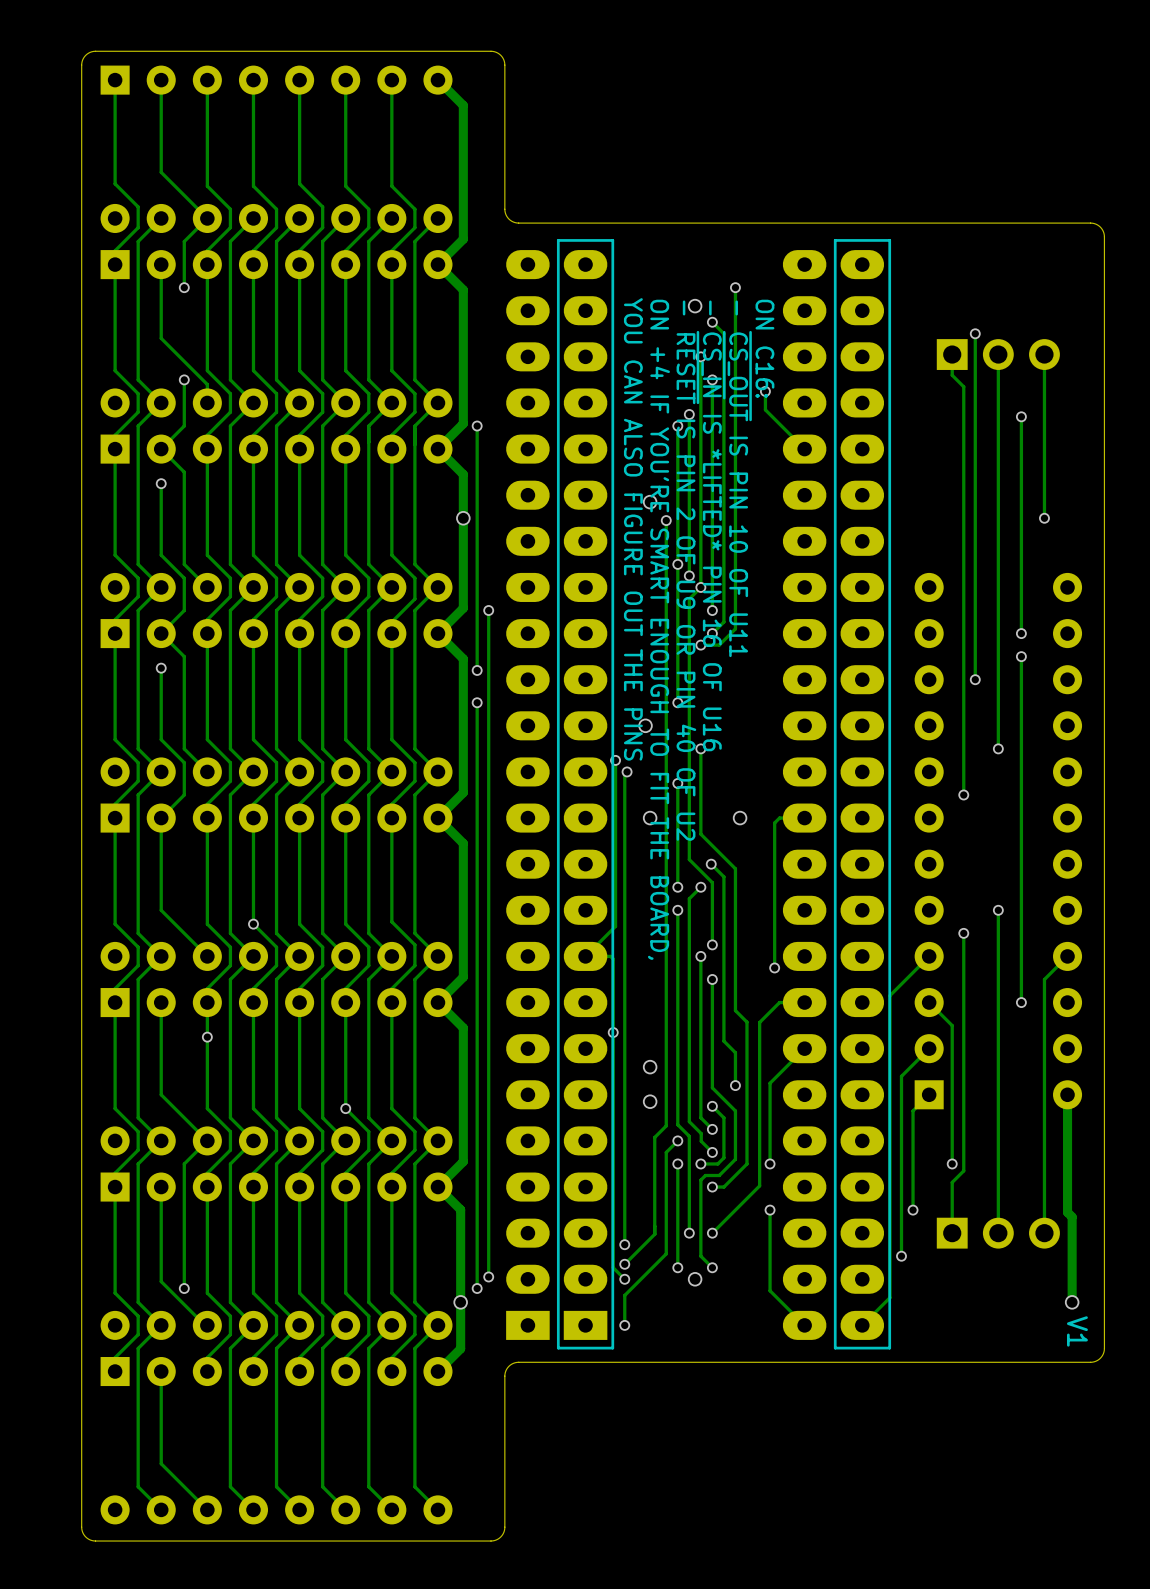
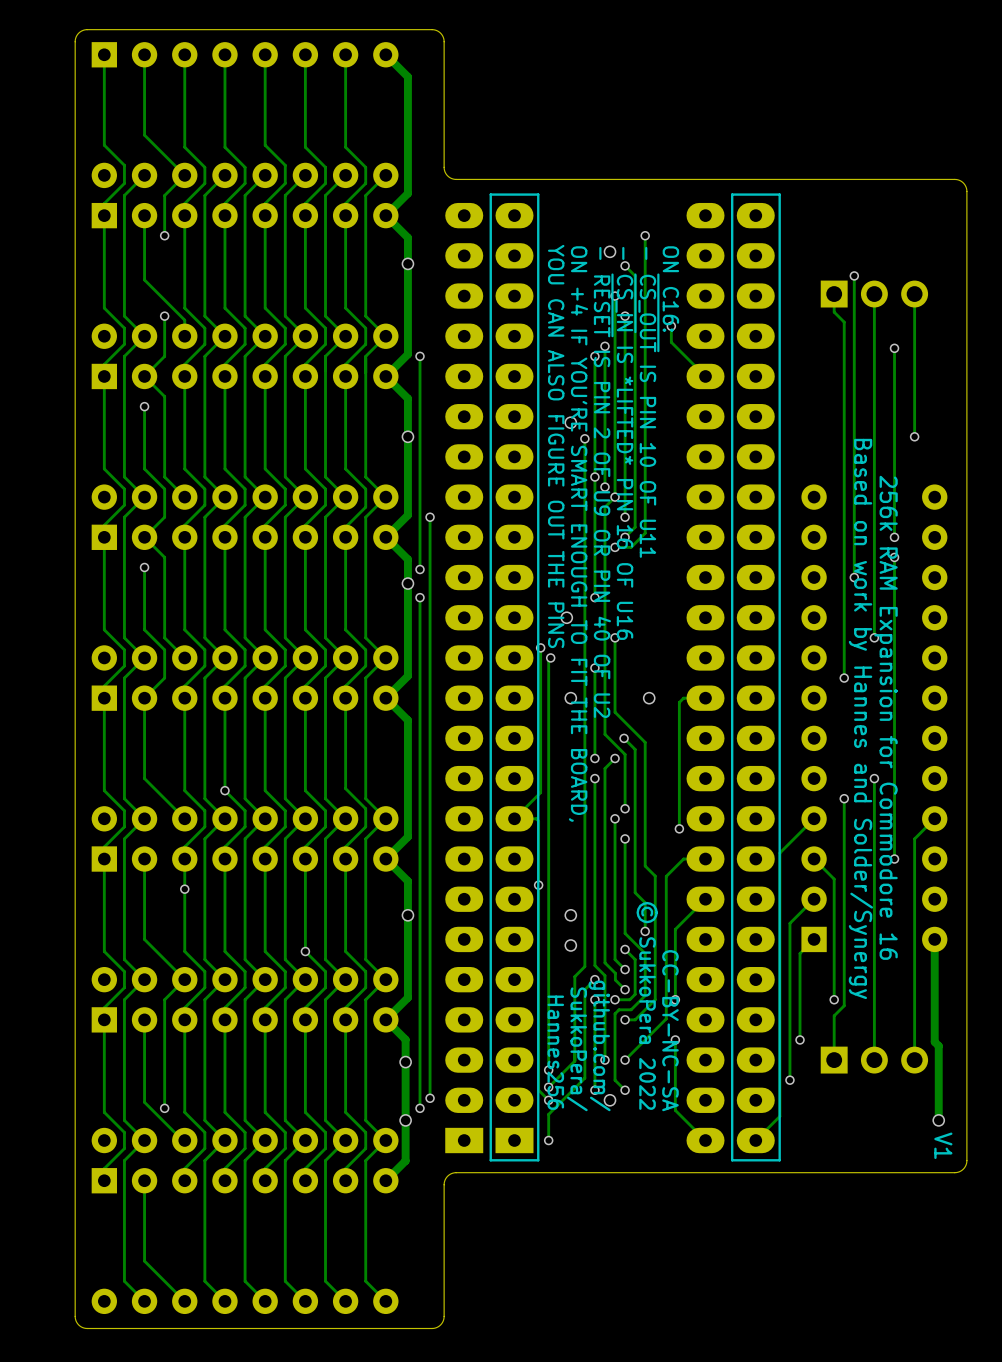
via: none -> (407, 263)
via: none -> (407, 583)
text: none -> 256k RAM Expansion for Commodore 16 (886, 717)
text: none -> Based on work by Hannes and Solder/Synergy (860, 718)
via: none -> (407, 915)
text: none -> © SukkoPera 2022 (647, 1005)
text: none -> CC-BY-NC-SA (670, 1030)
text: none -> github.com/ (599, 1045)
text: none -> SukkoPera/ (577, 1049)
text: none -> Hannes256 (555, 1052)
via: none -> (405, 1062)

